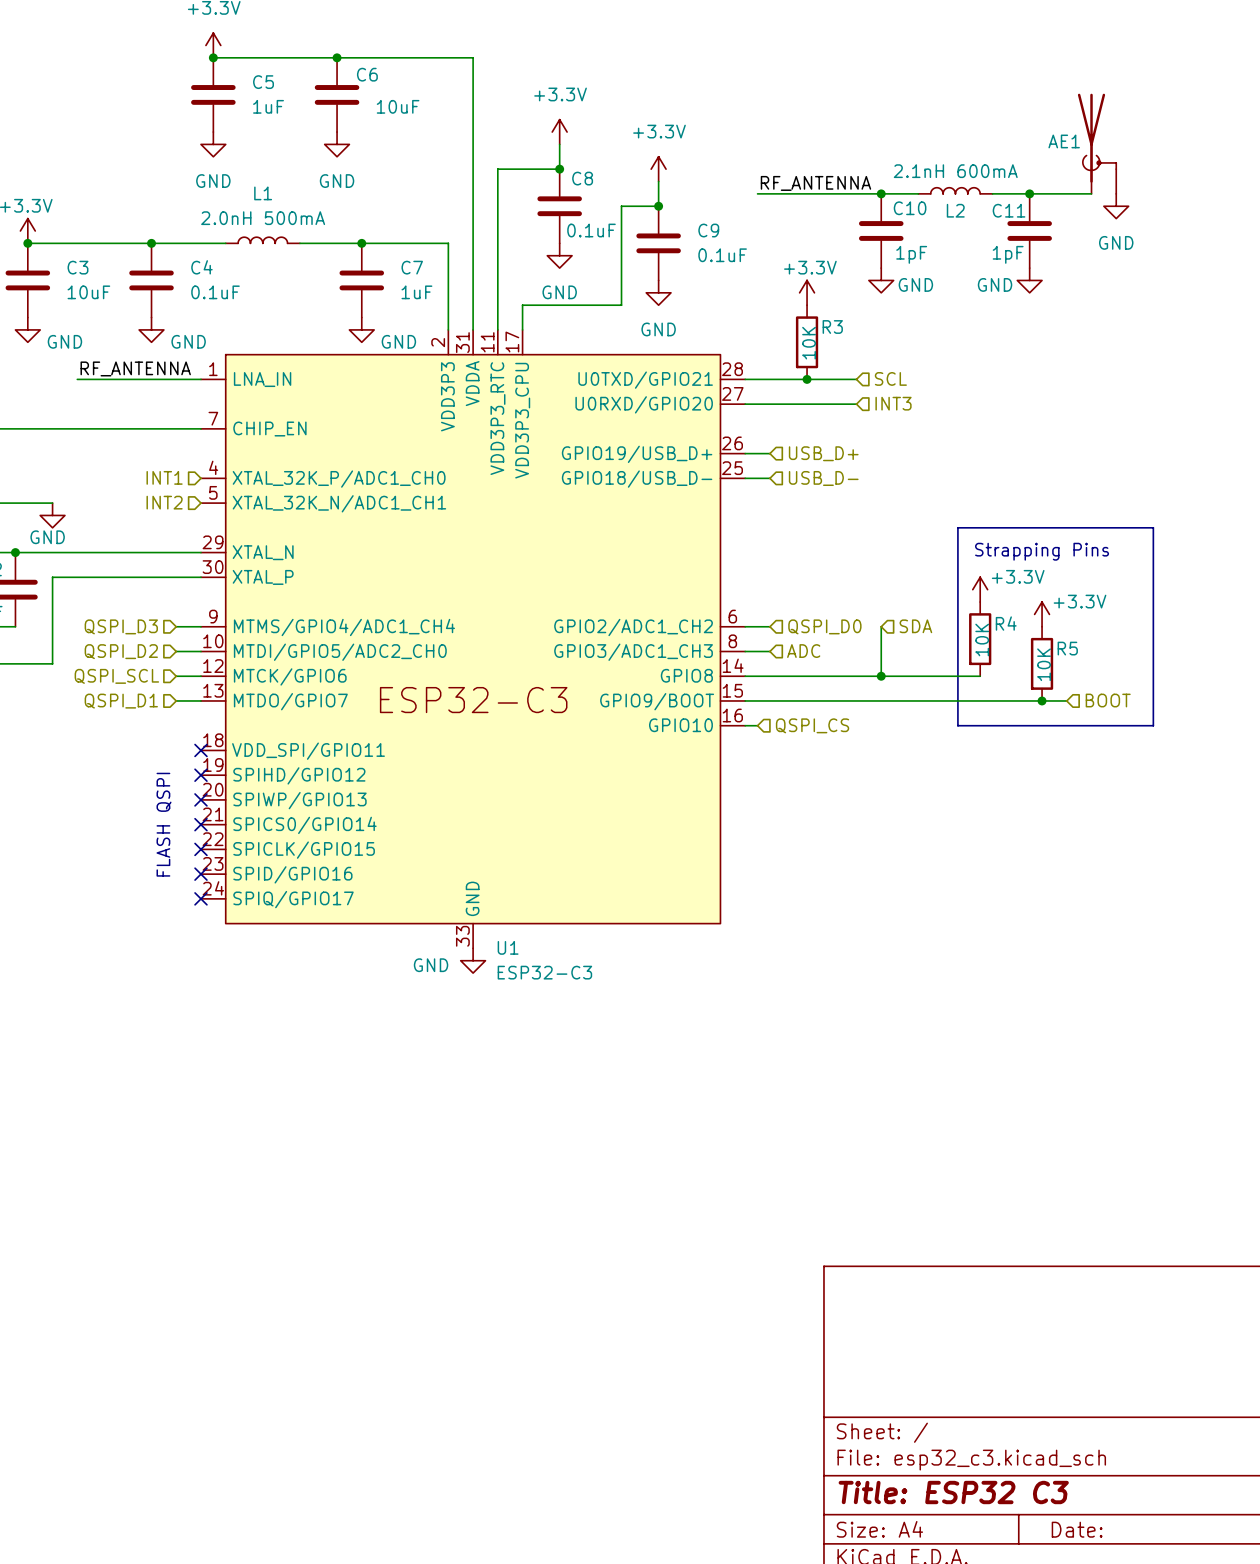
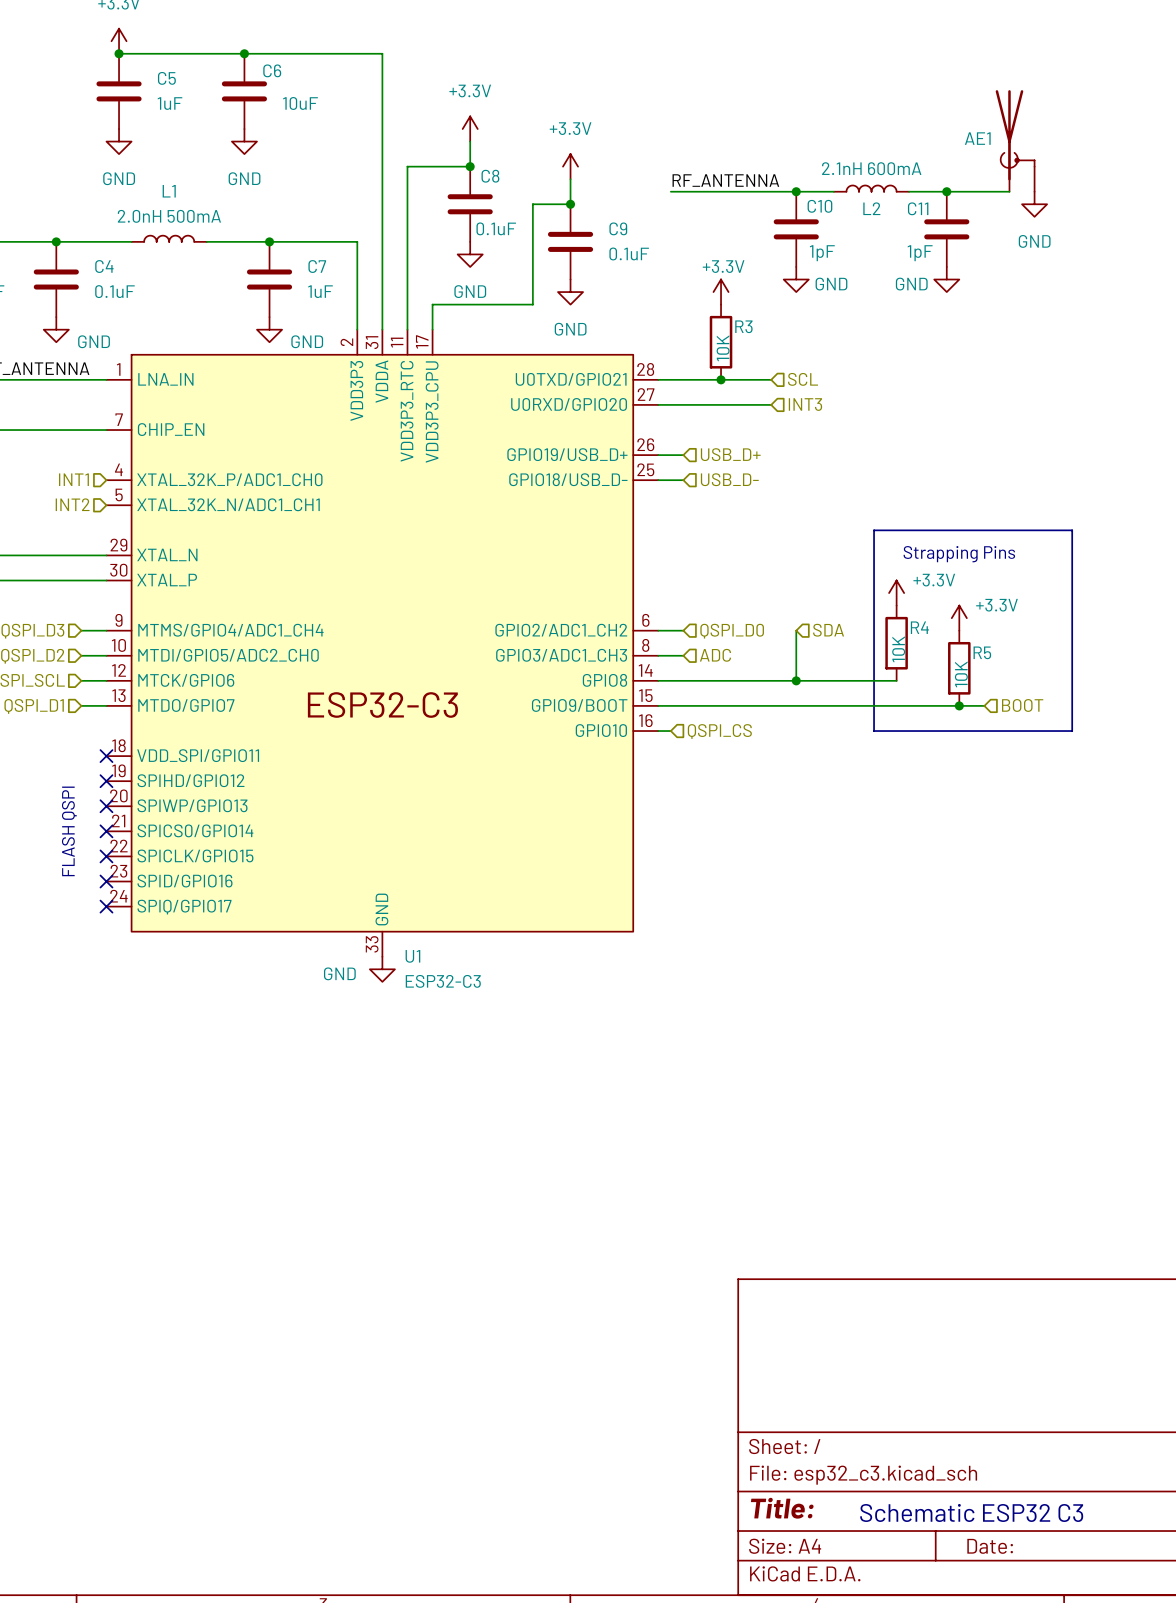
title block: Title: ESP32 C3 (953, 1492) -> Title: (782, 1508)
text: none -> Schematic ESP32 C3 (971, 1512)

